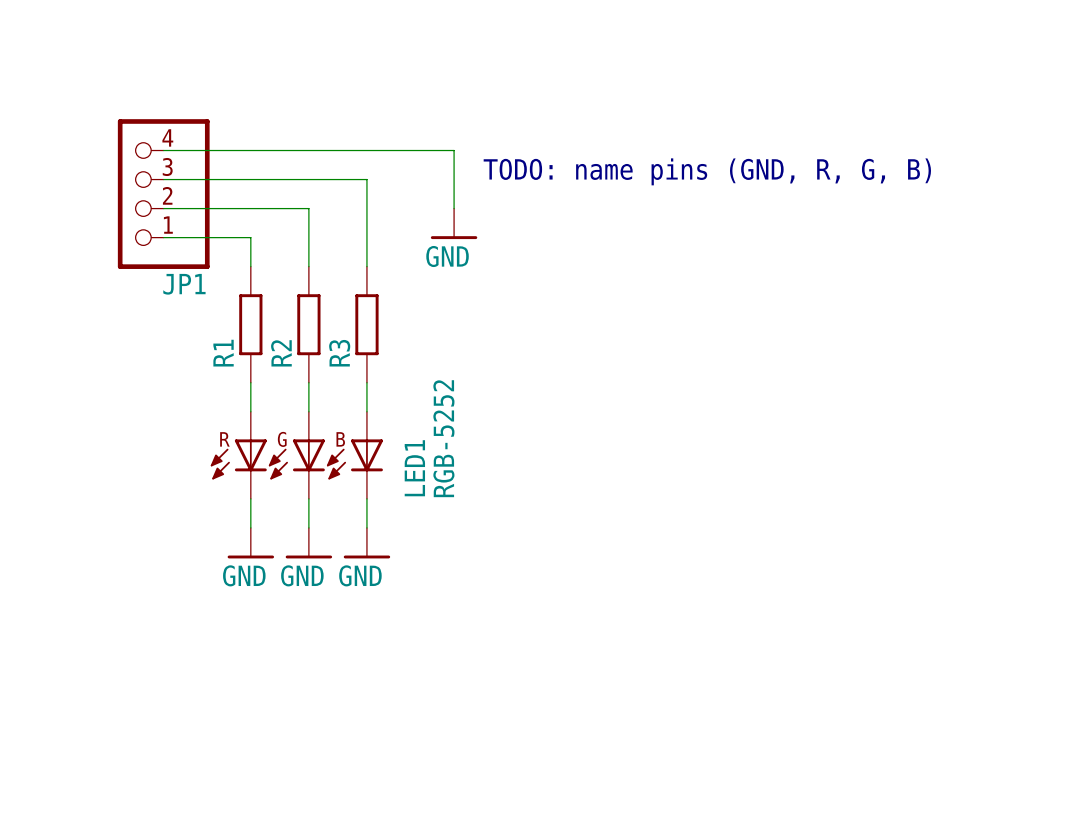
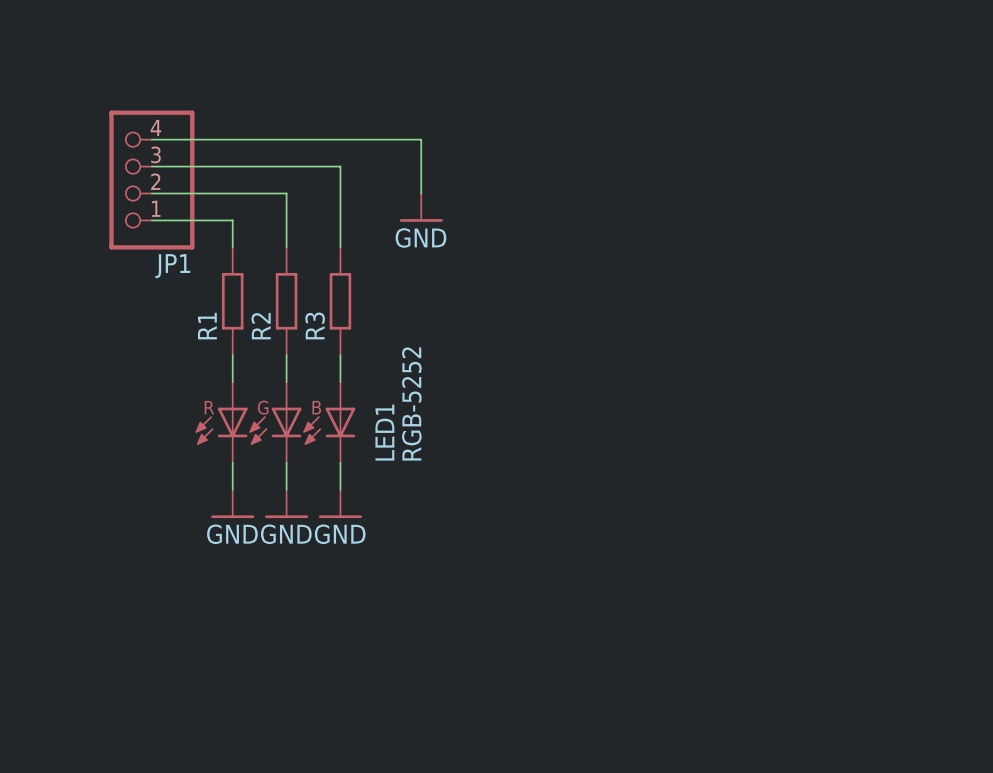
text: TODO: name pins (GND, R, G, B) (707, 171) -> none

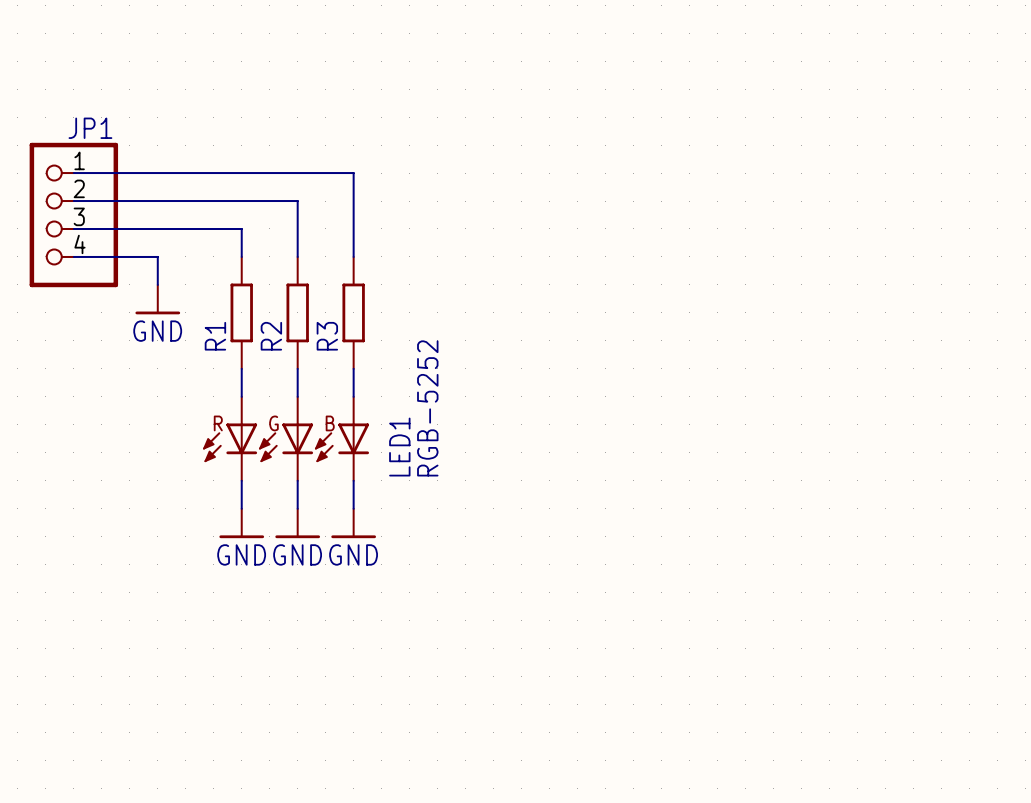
wire: (151, 139) (421, 139) (421, 193) -> none
wire: none -> (73, 173) (157, 173)
JP1 flip: as is (151, 180) -> up-down (73, 215)
JP1 position: (151, 180) -> (73, 215)
wire: none -> (73, 201) (157, 201)
power symbol: GND (421, 207) -> none
wire: none -> (73, 228) (157, 228)
wire: none -> (73, 256) (157, 256) (157, 284)
power symbol: none -> GND (157, 299)

